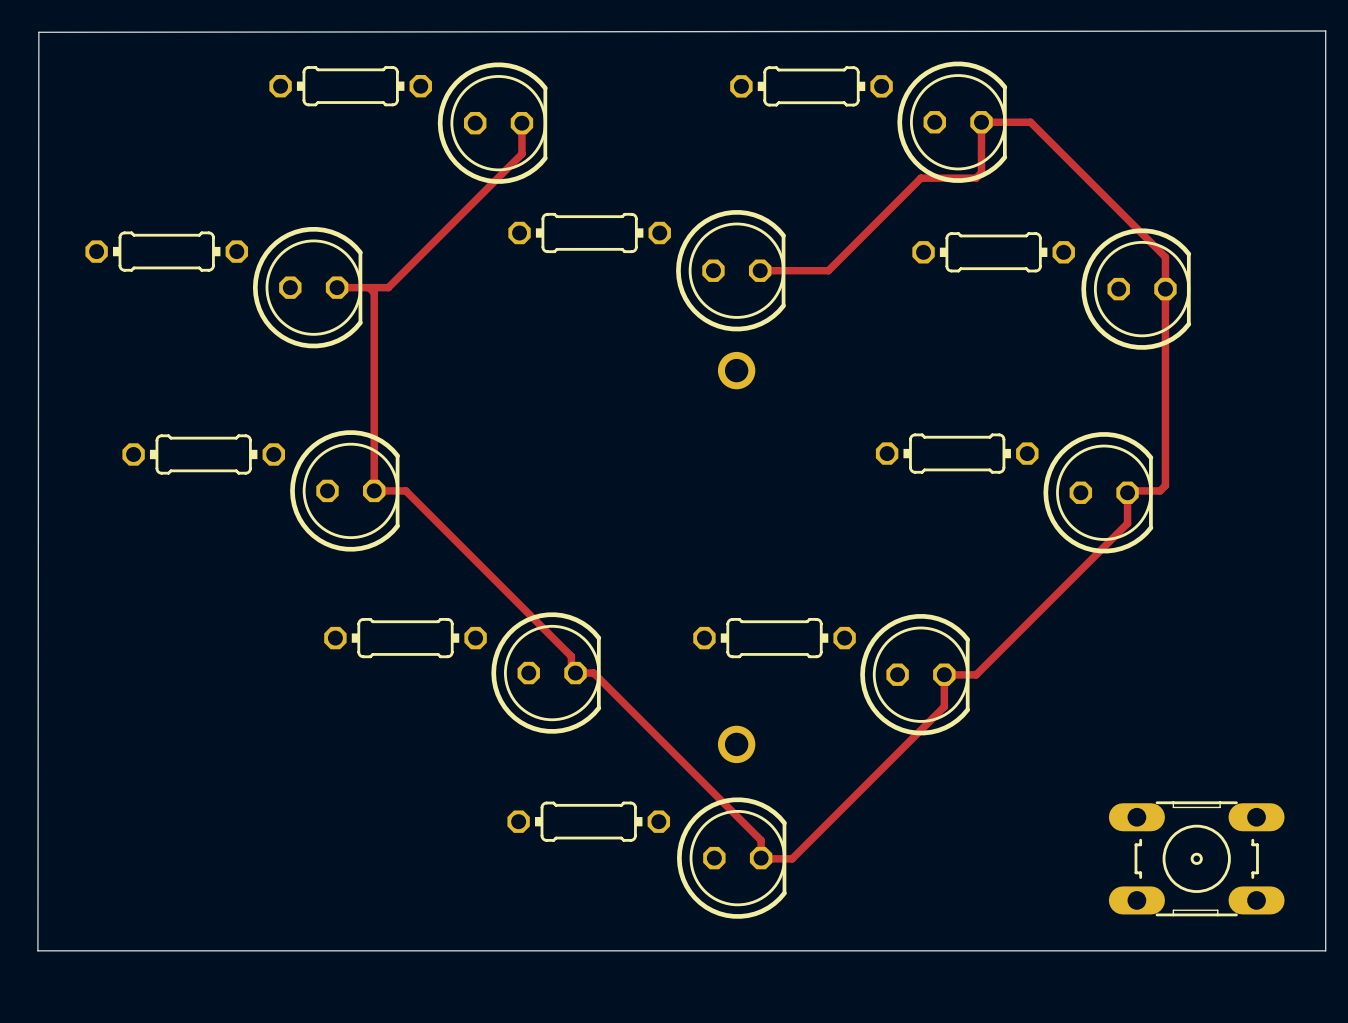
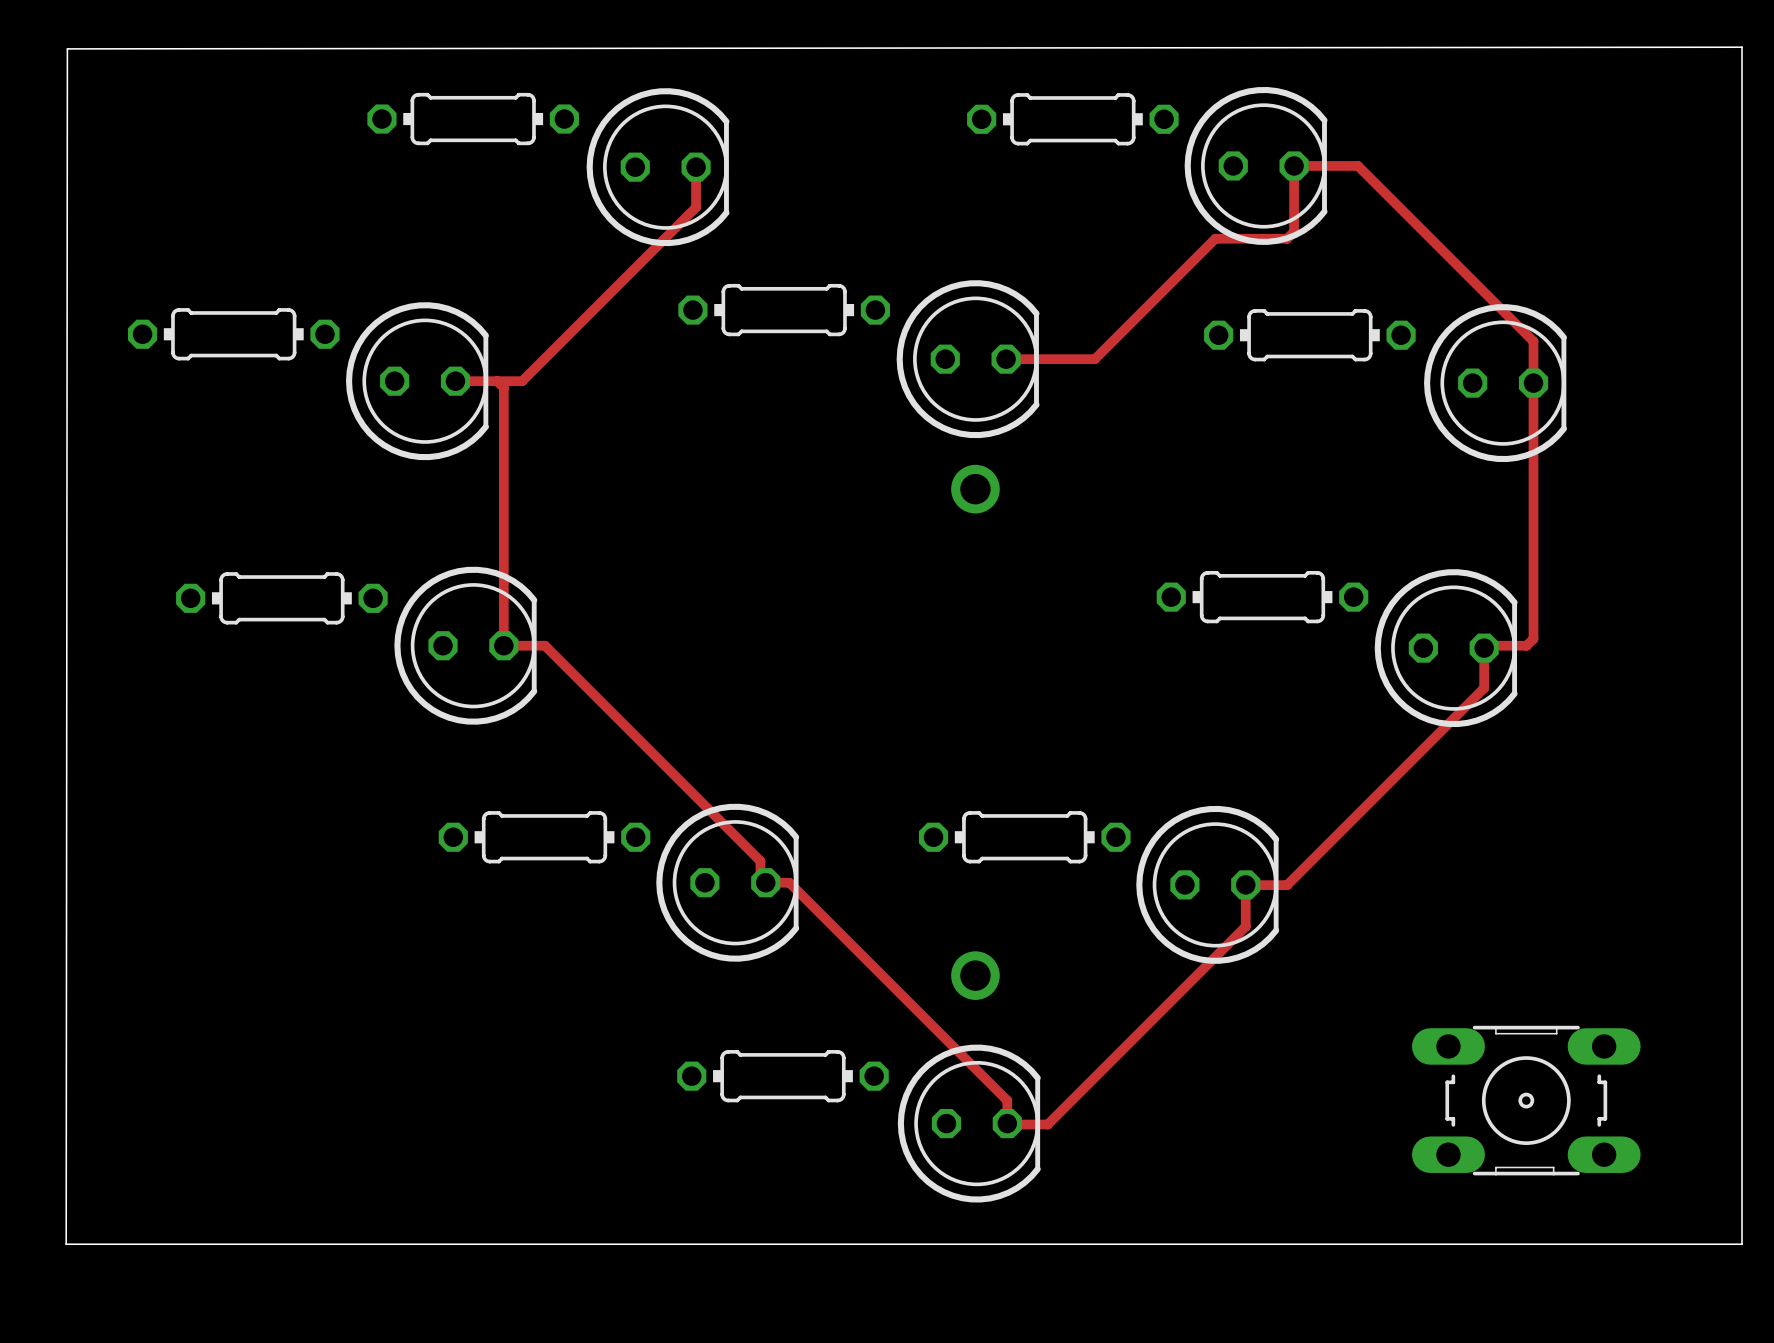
part position: (1196, 858) -> (1526, 1100)

